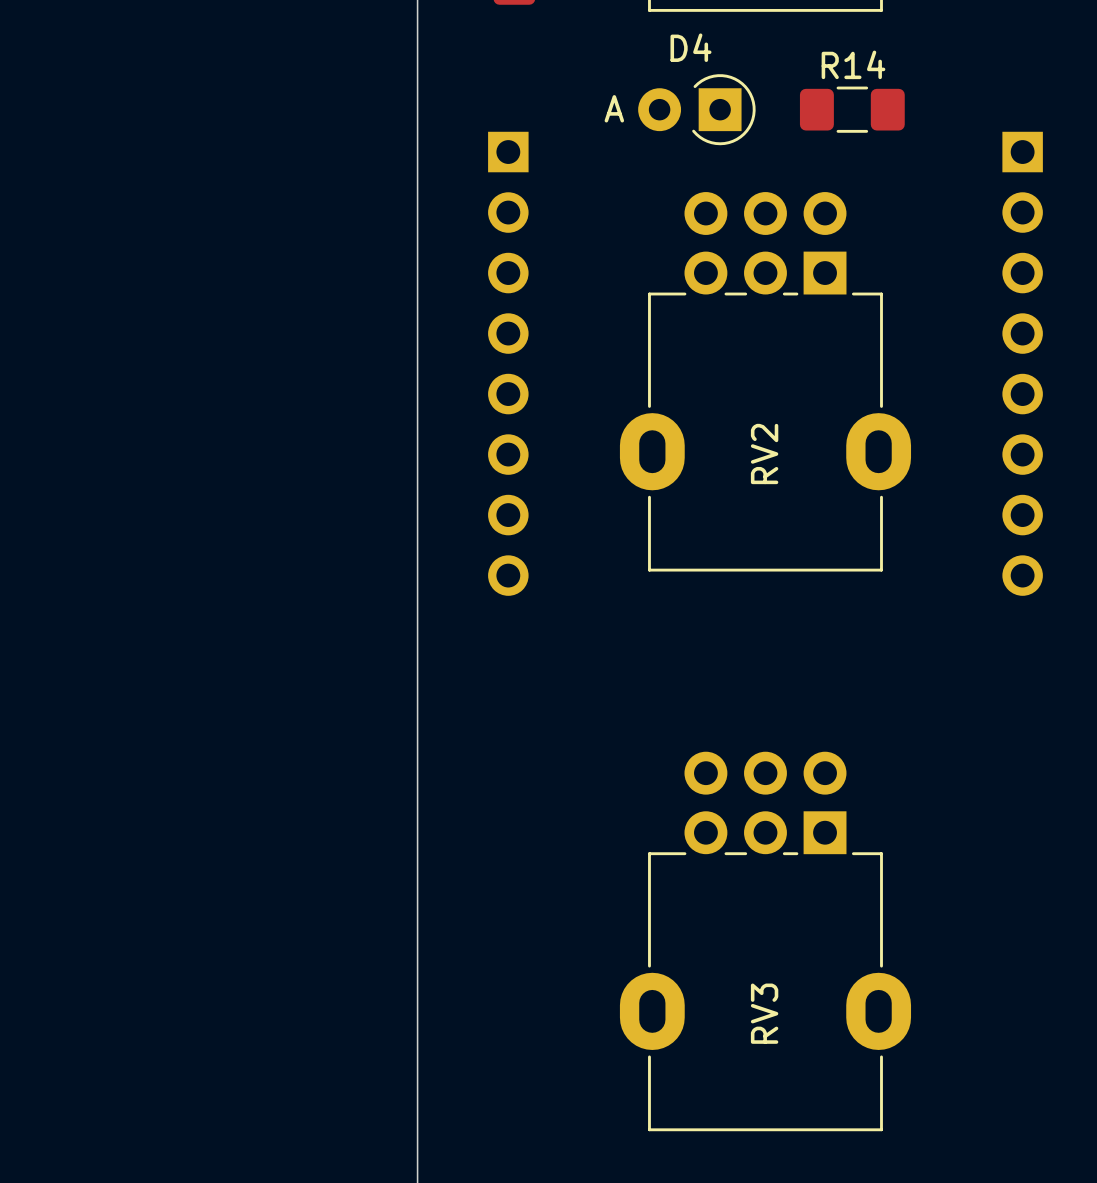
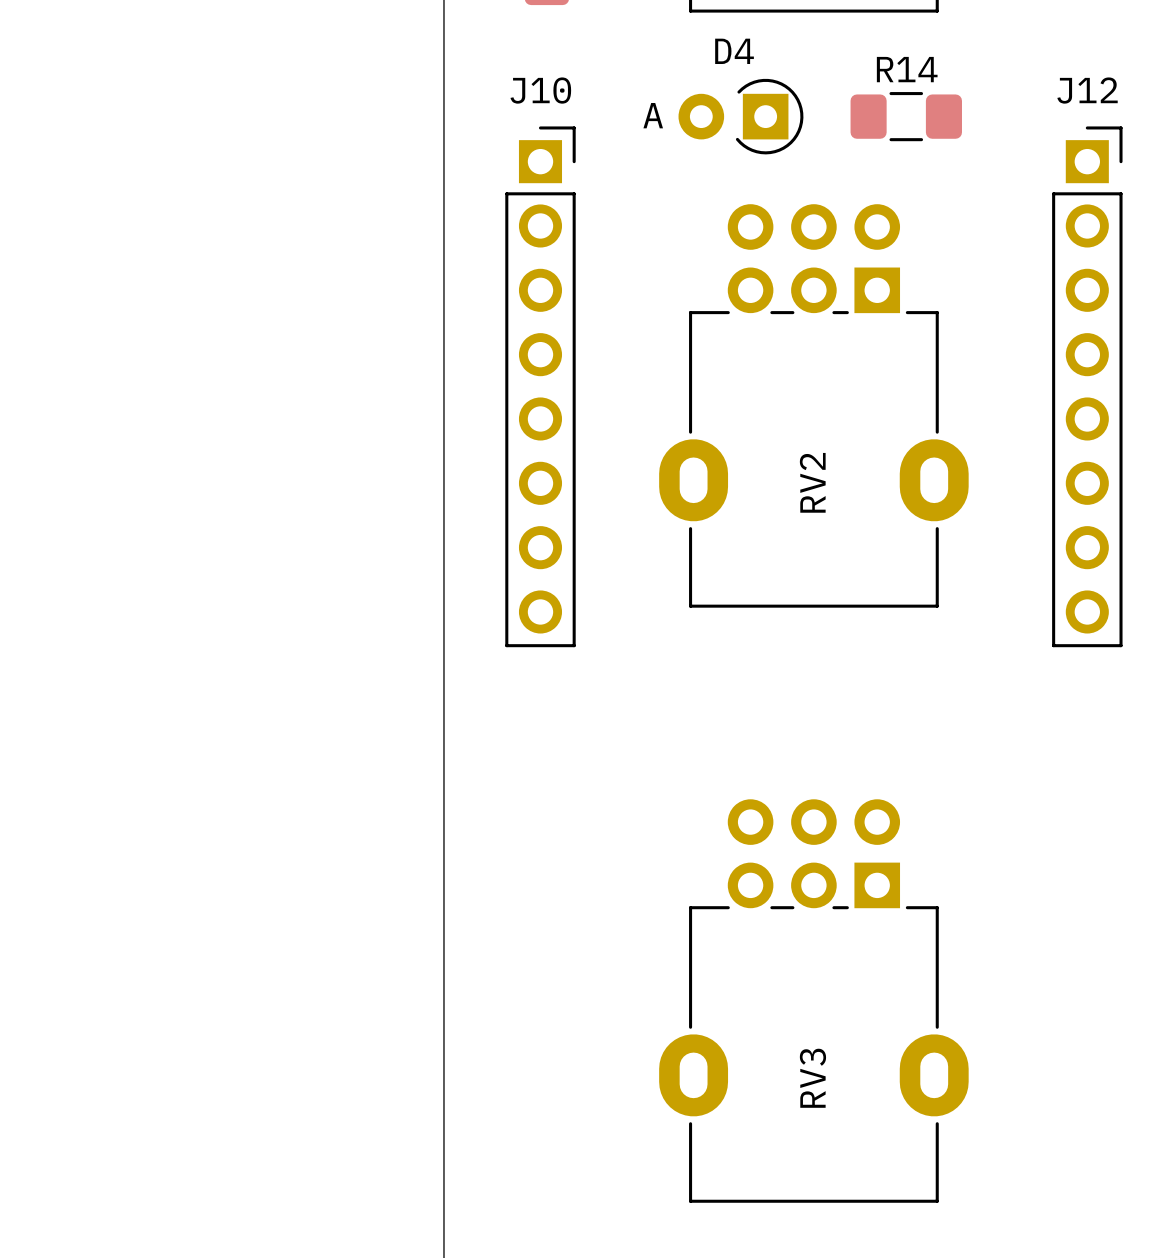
J10 side: bottom (508, 363) -> top (540, 386)
J12 side: bottom (1022, 363) -> top (1087, 386)

